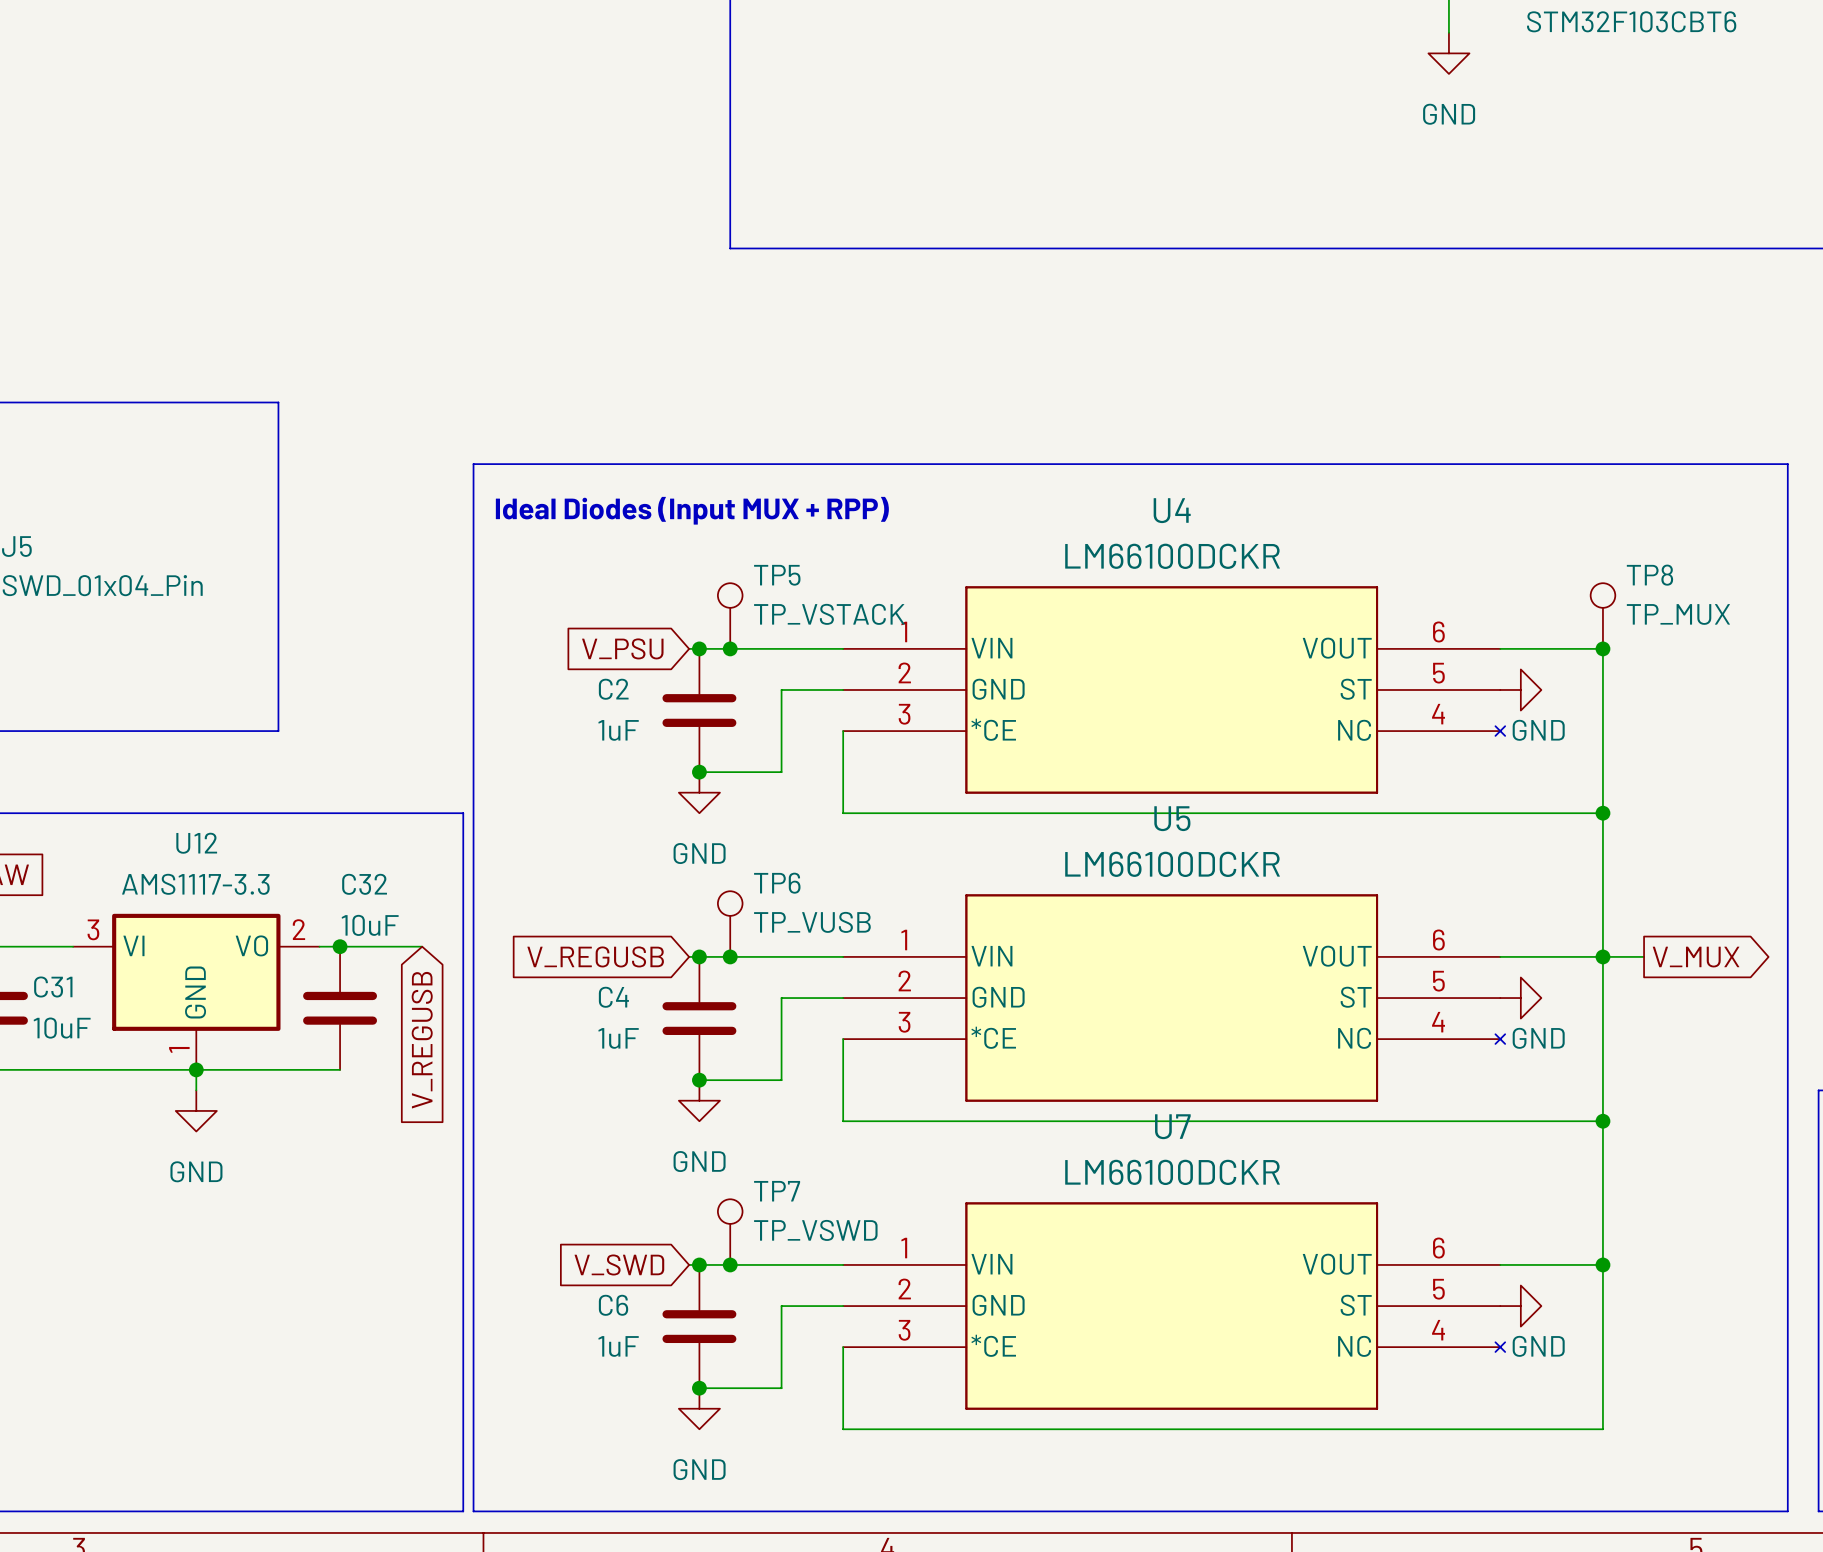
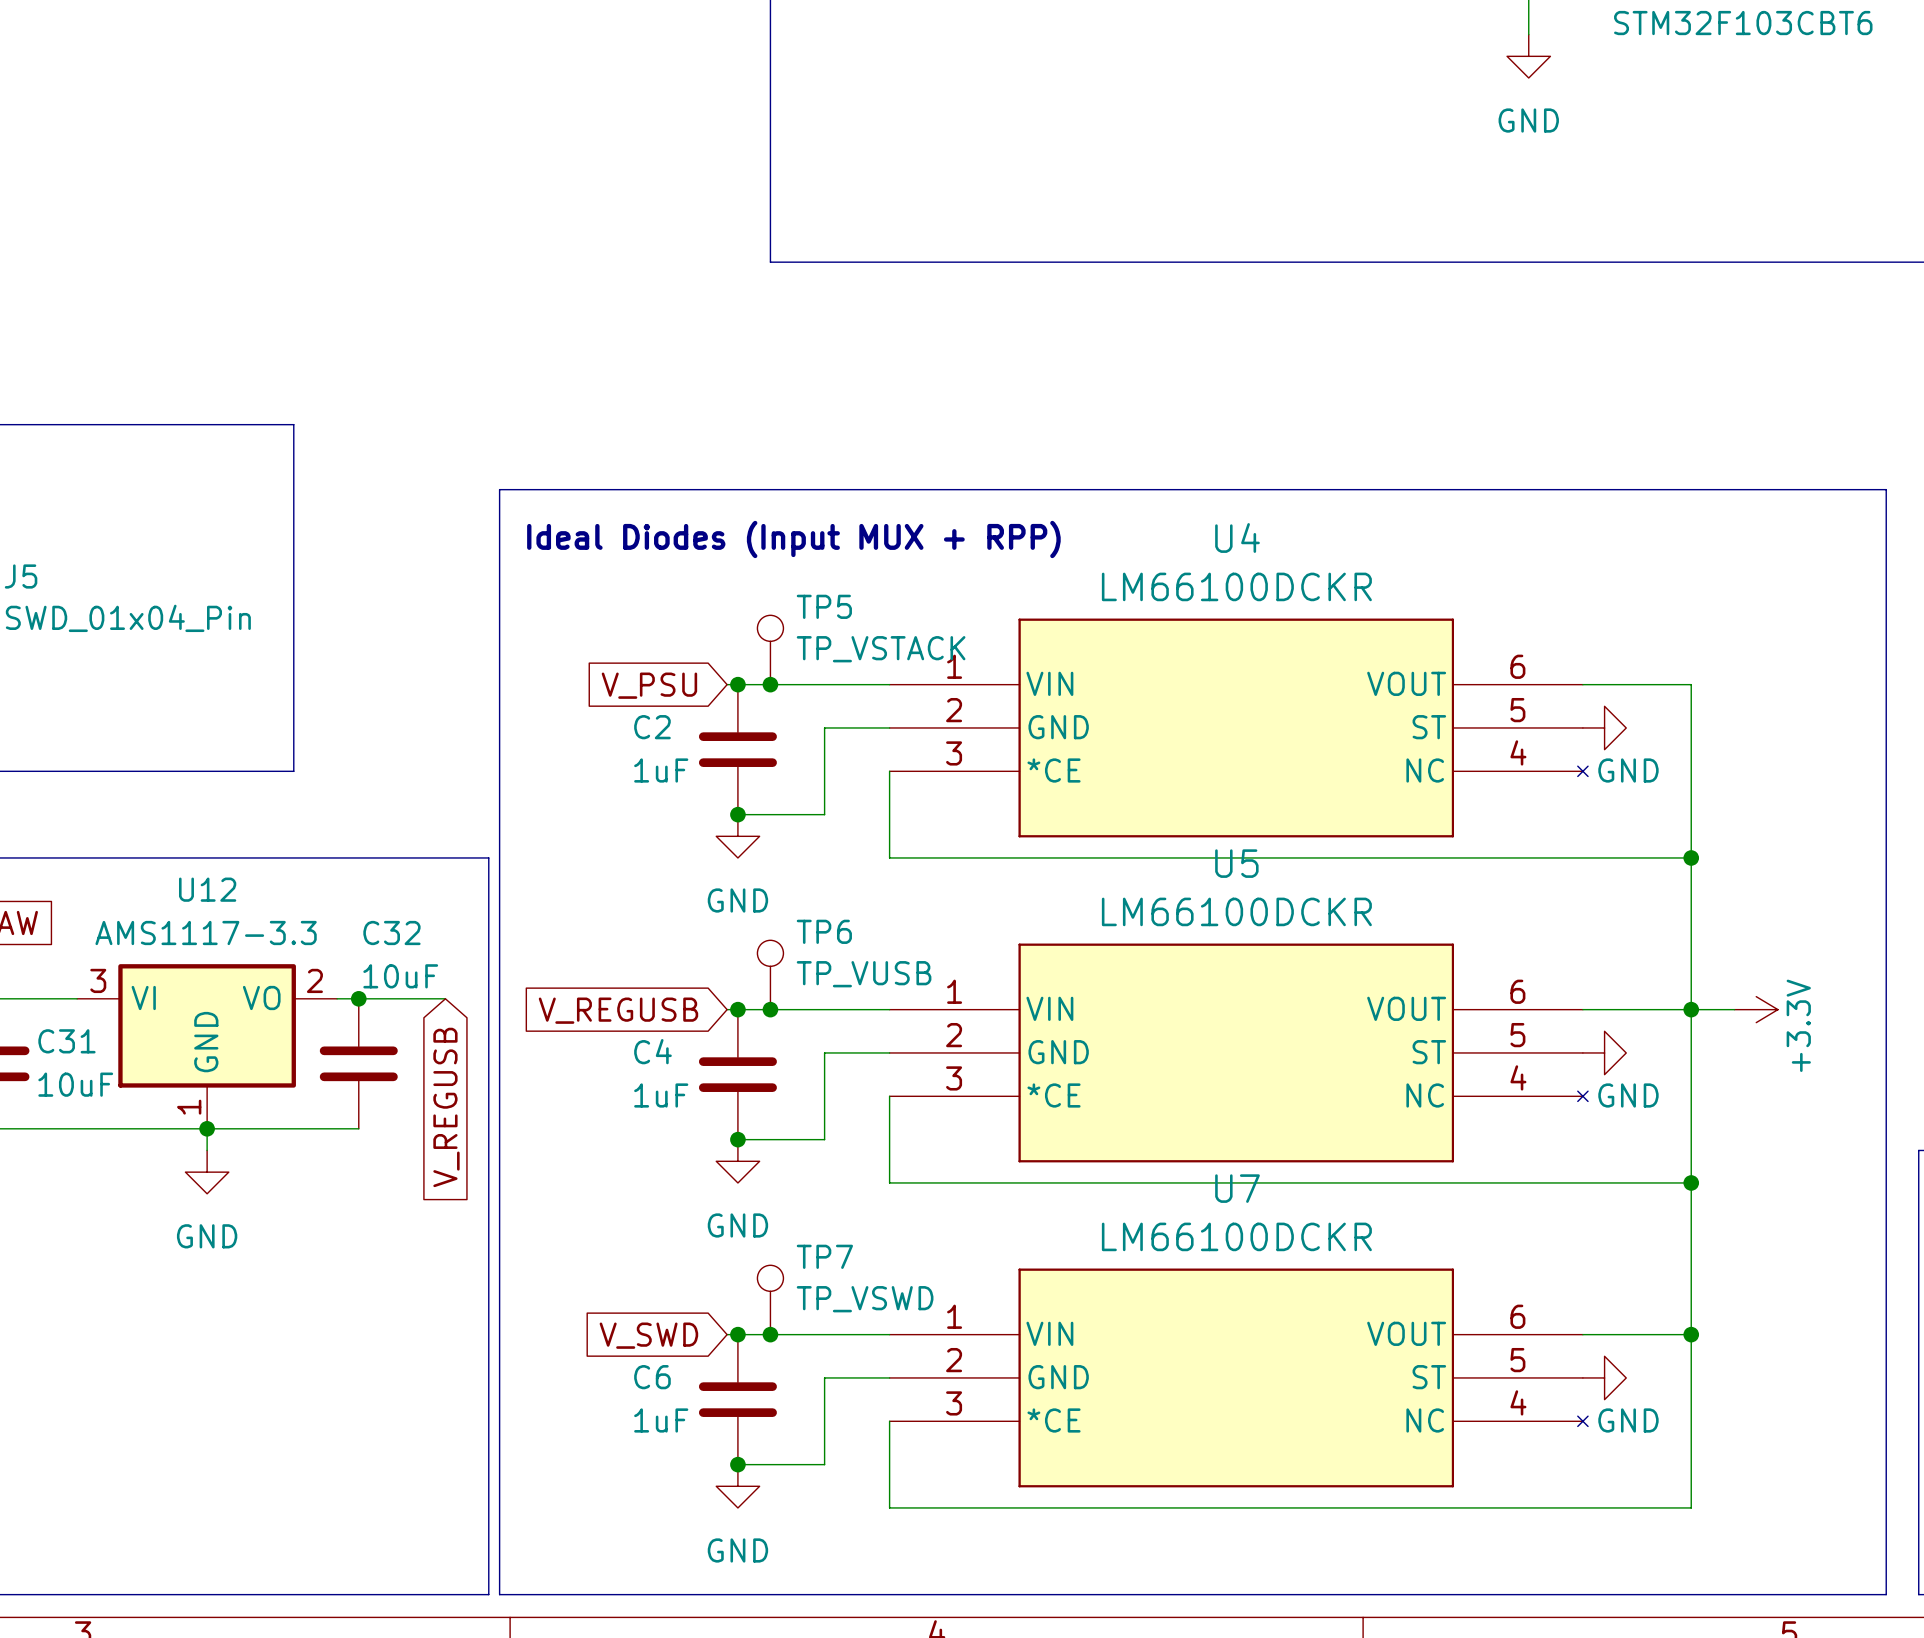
TP8: TP_MUX (1602, 616) -> none
junction: (1602, 648) -> none
power symbol: none -> +3.3V (1756, 1009)
global label: V_MUX (1696, 957) -> none

